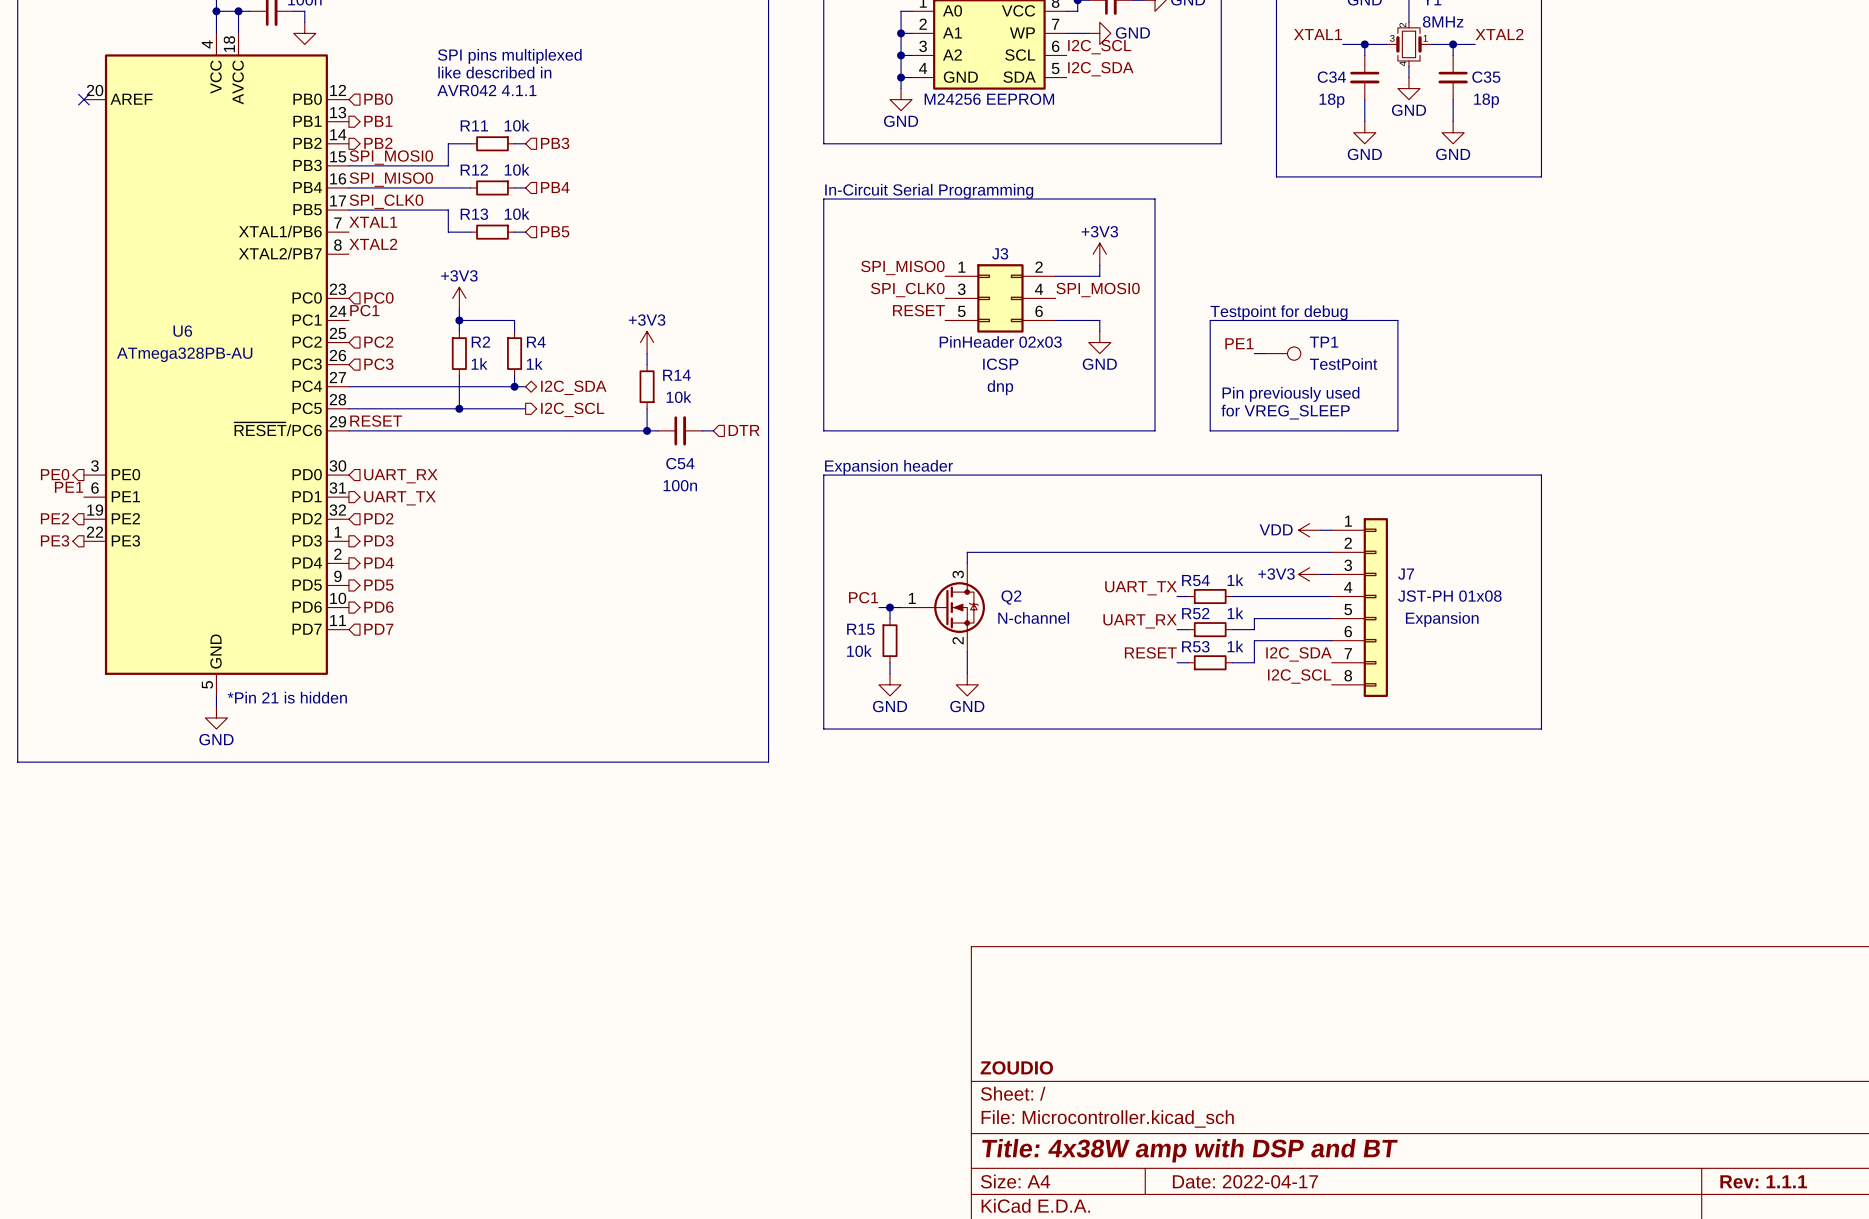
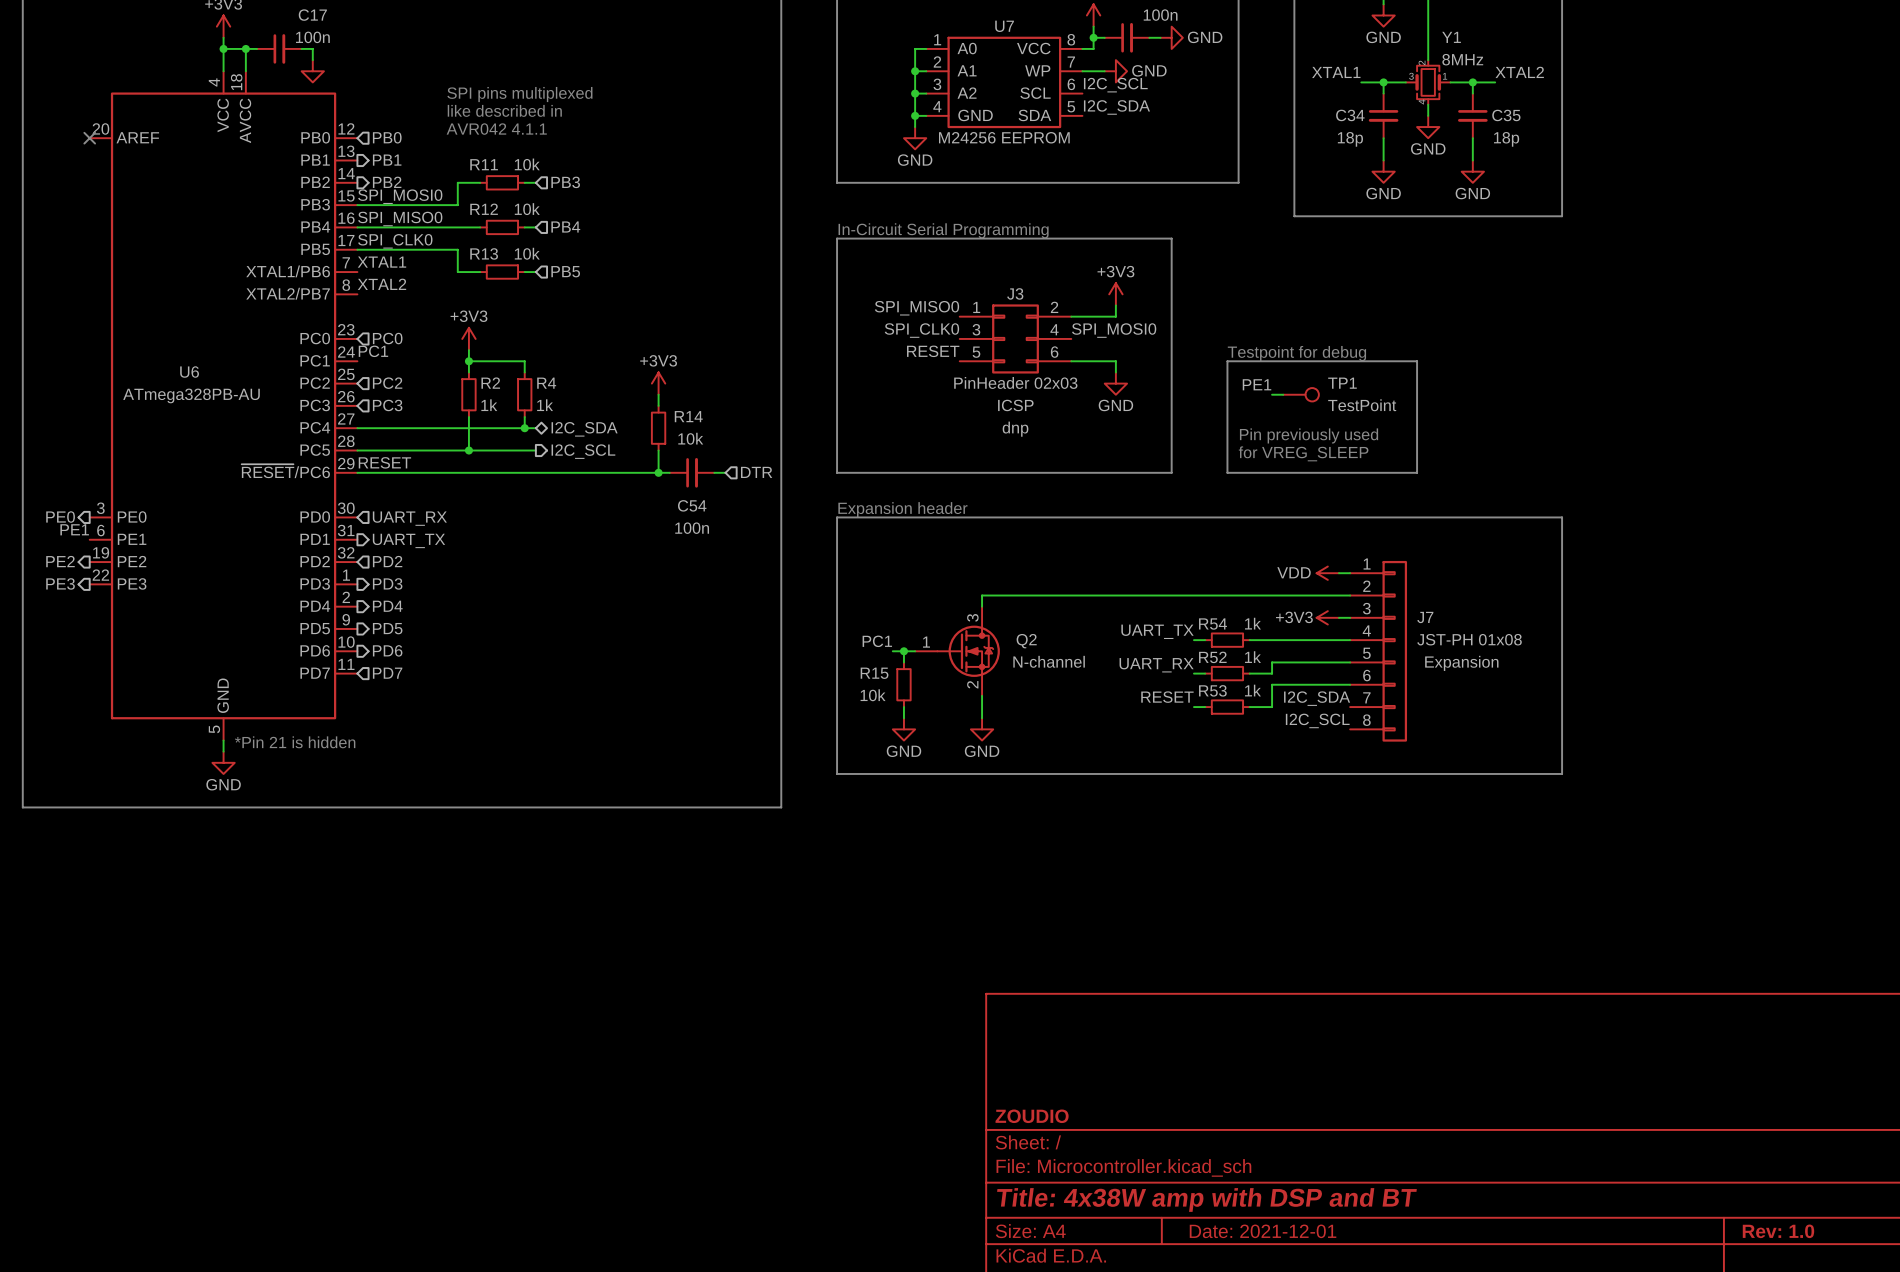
title block: Date: 2022-04-17 (1245, 1181) -> Date: 2021-12-01 (1263, 1231)
title block: Rev: 1.1.1 (1763, 1181) -> Rev: 1.0 (1778, 1231)

